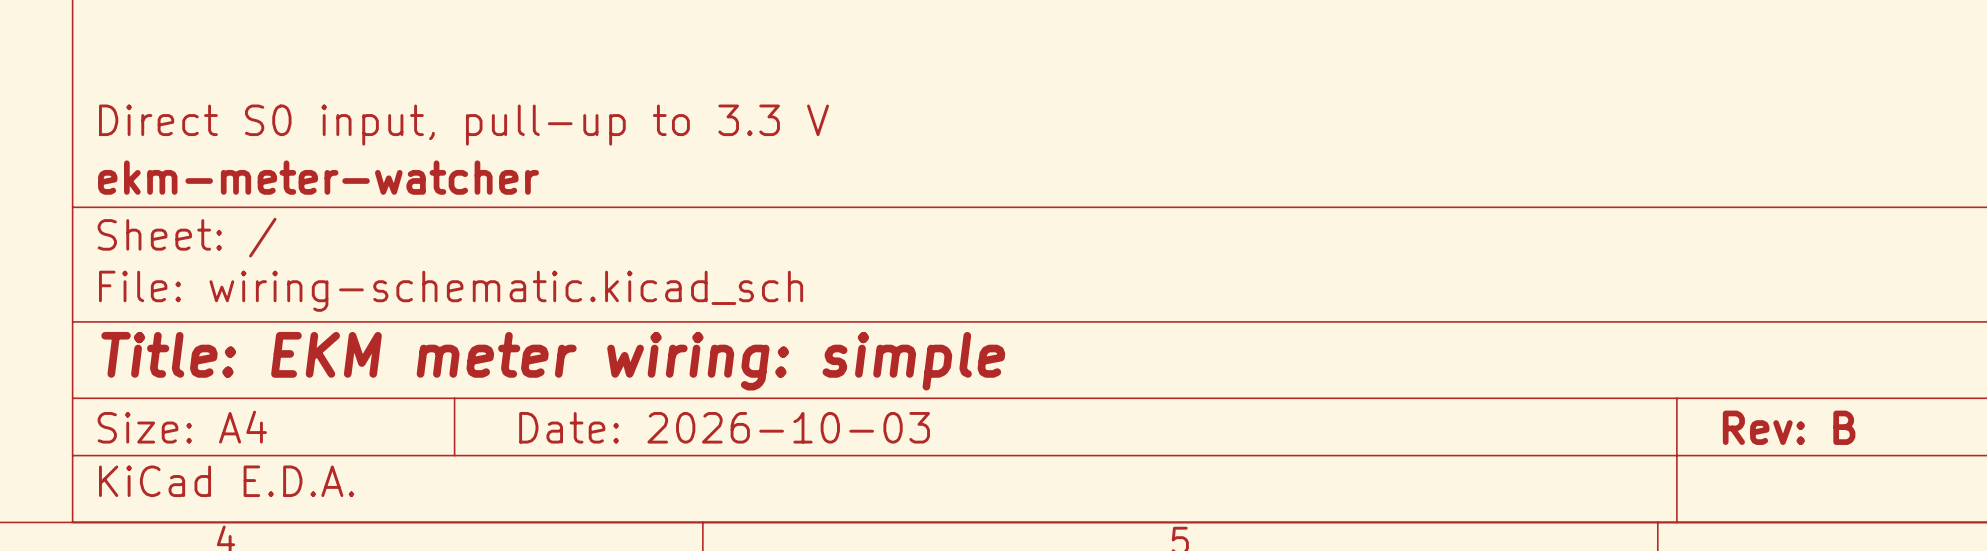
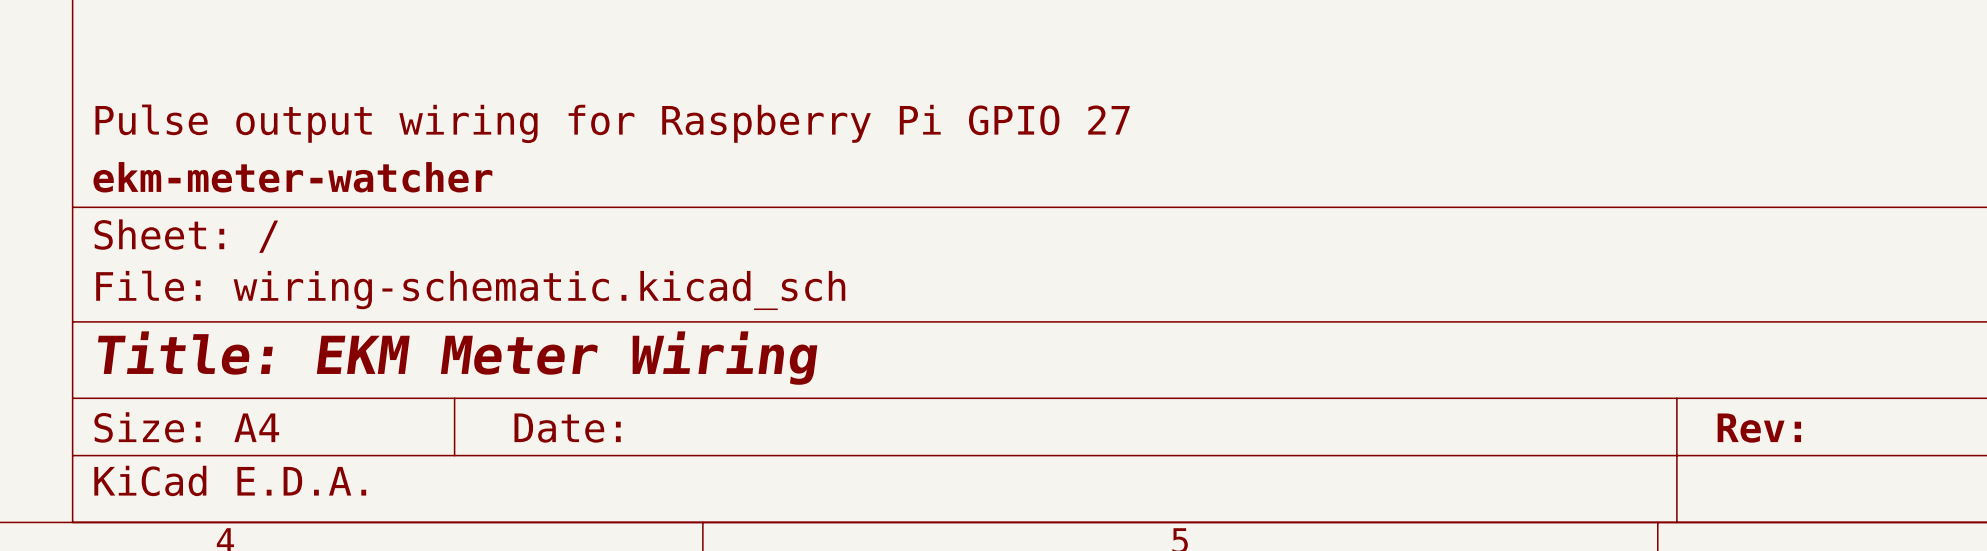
title block: Direct S0 input, pull-up to 3.3 V (464, 125) -> Pulse output wiring for Raspberry Pi GPIO 27 (612, 123)
title block: Title: EKM meter wiring: simple (553, 361) -> Title: EKM Meter Wiring (457, 358)
title block: Date: 2026-10-03 (724, 427) -> Date: (567, 428)
title block: Rev: B (1789, 427) -> Rev: (1759, 428)

